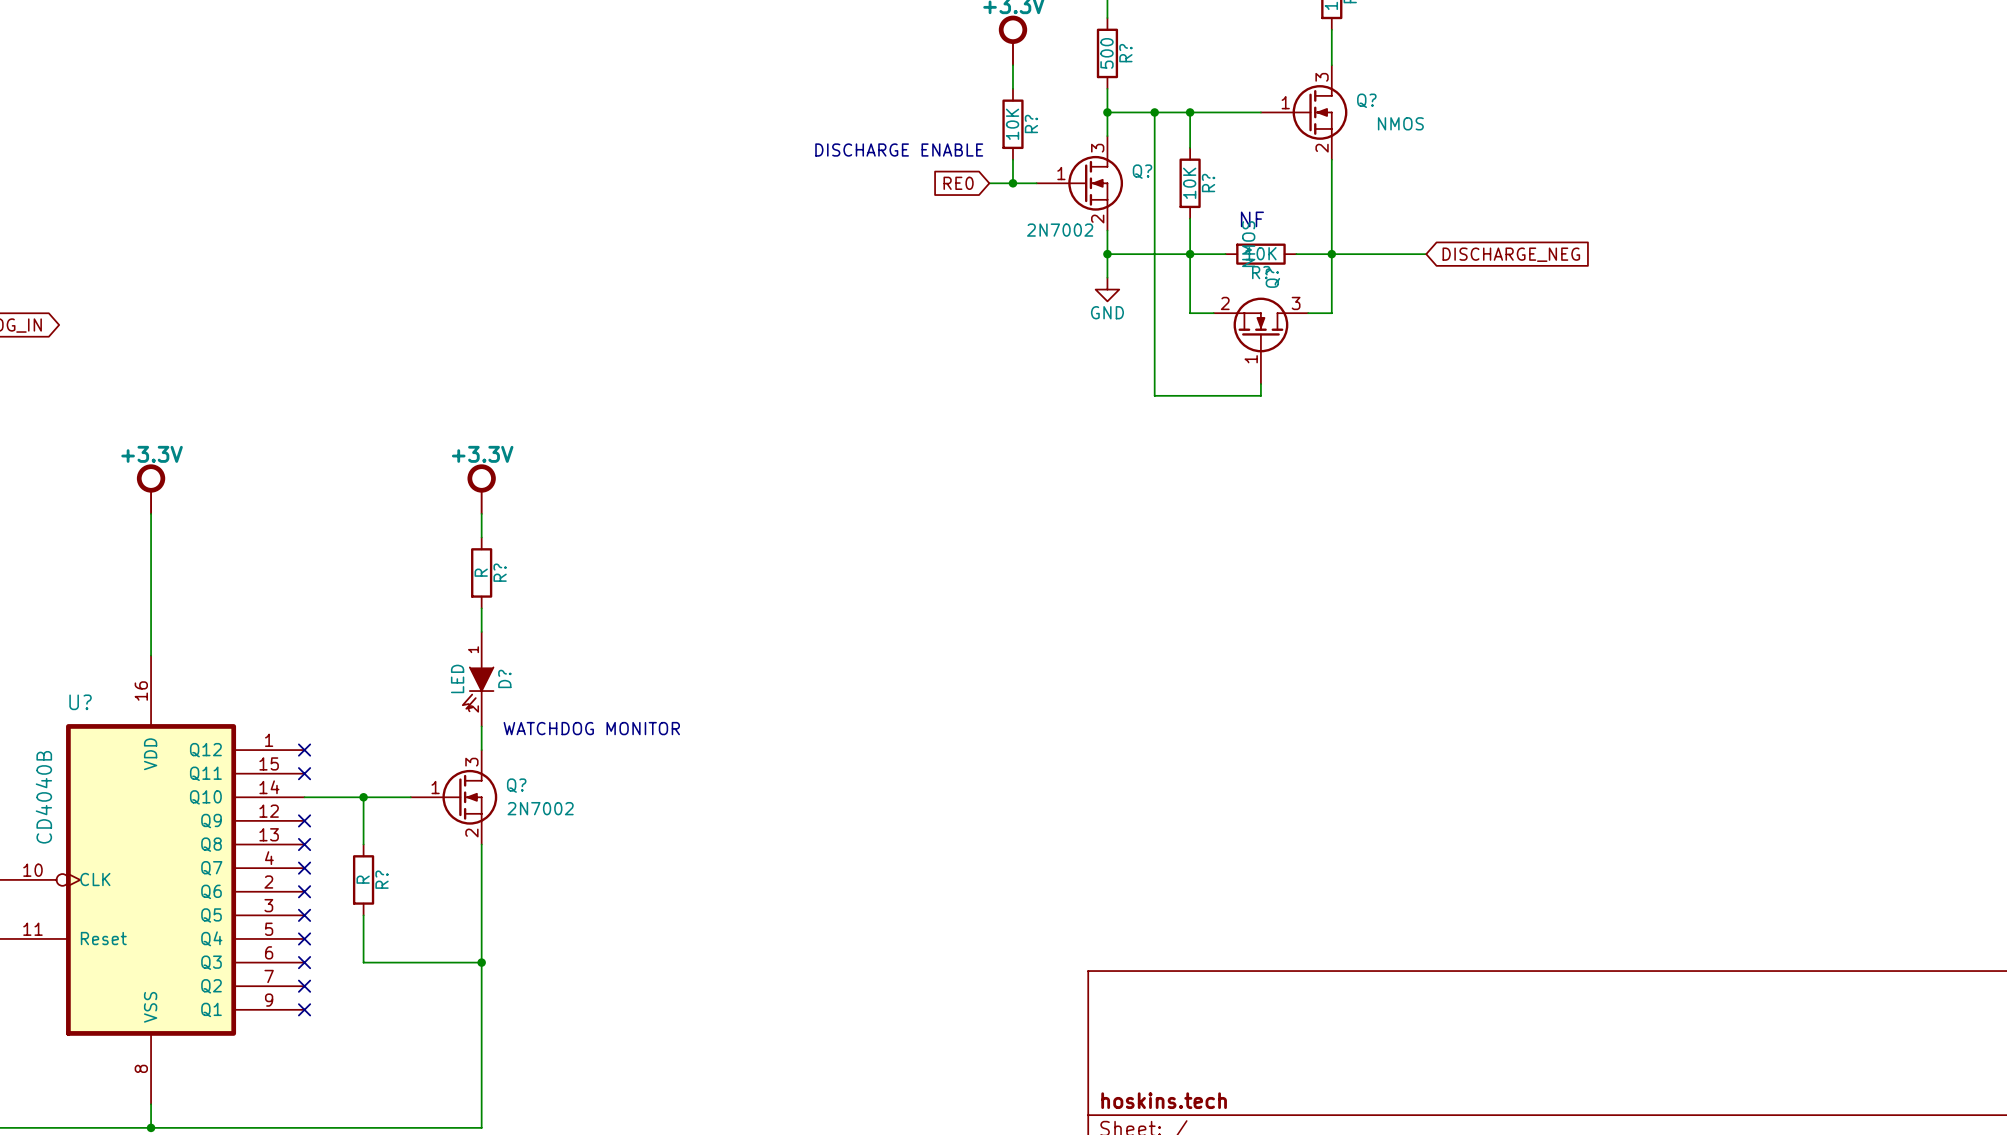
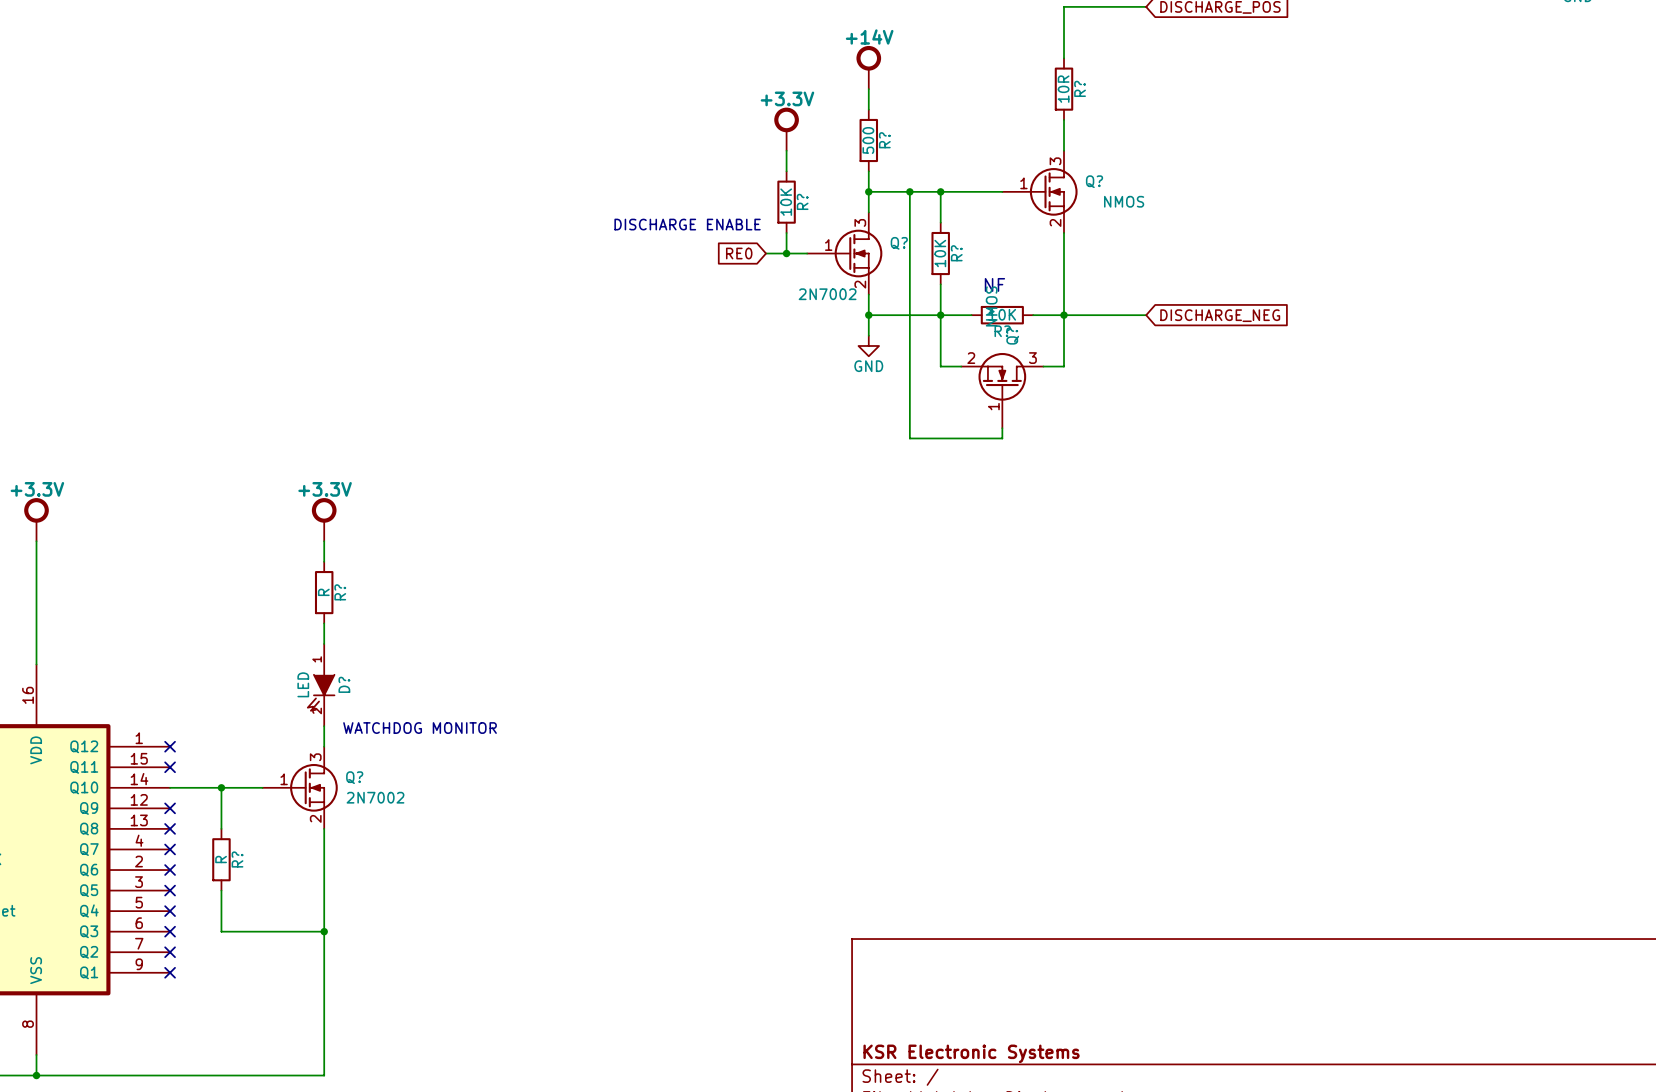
title block: hoskins.tech (1164, 1100) -> KSR Electronic Systems (971, 1053)

